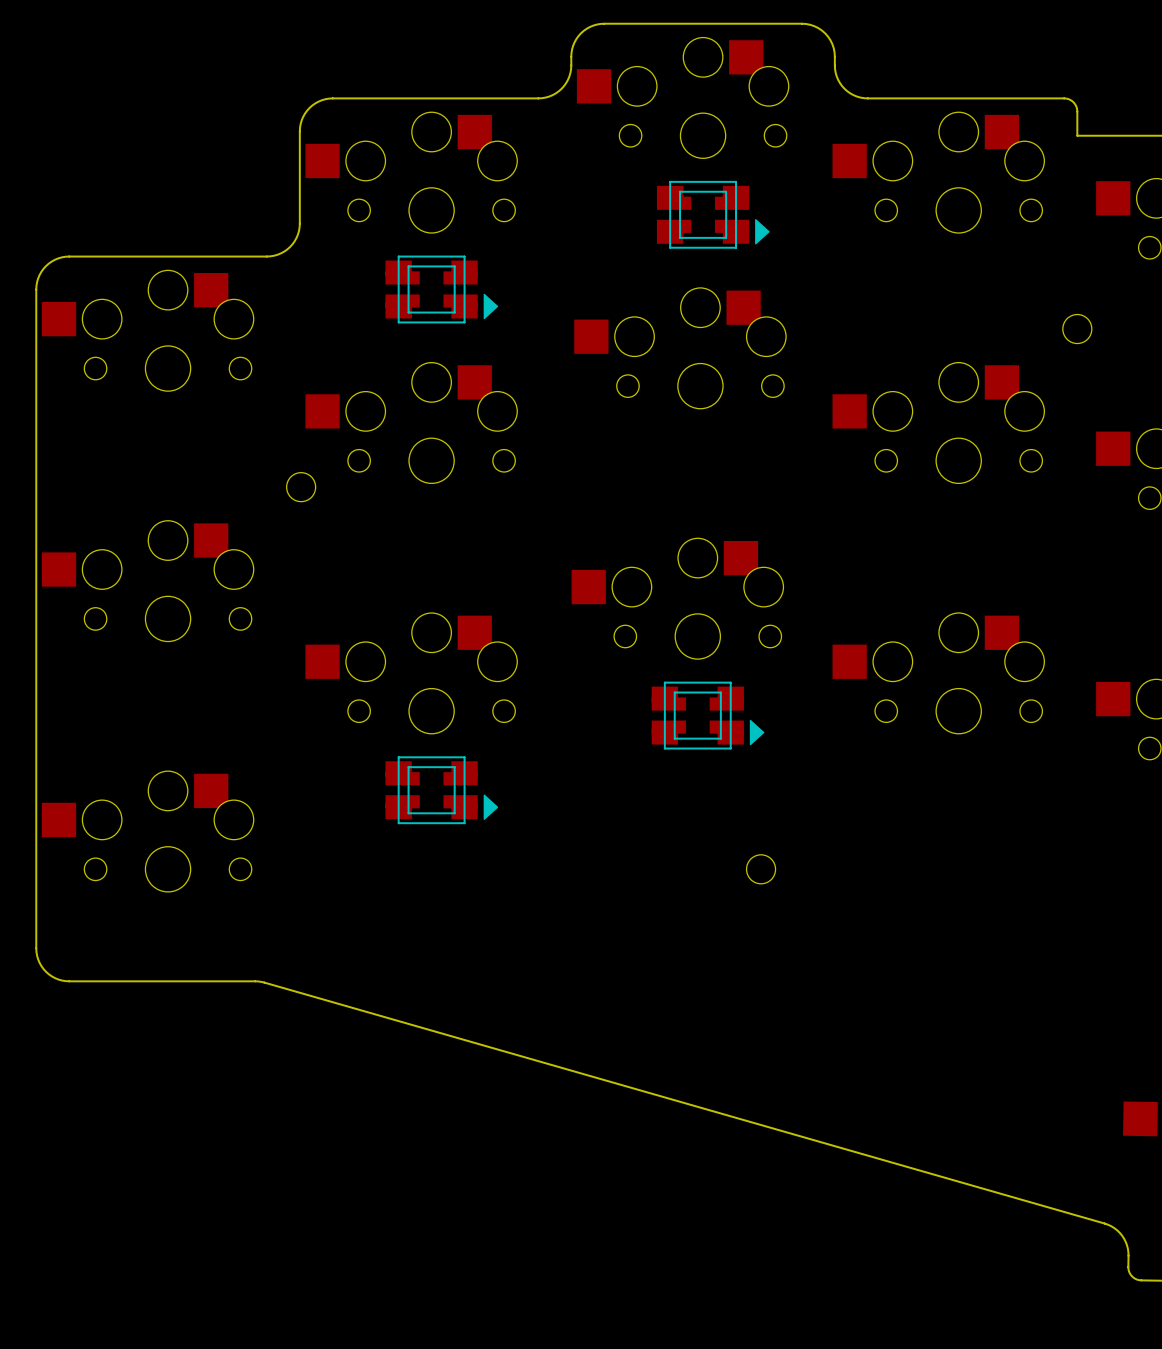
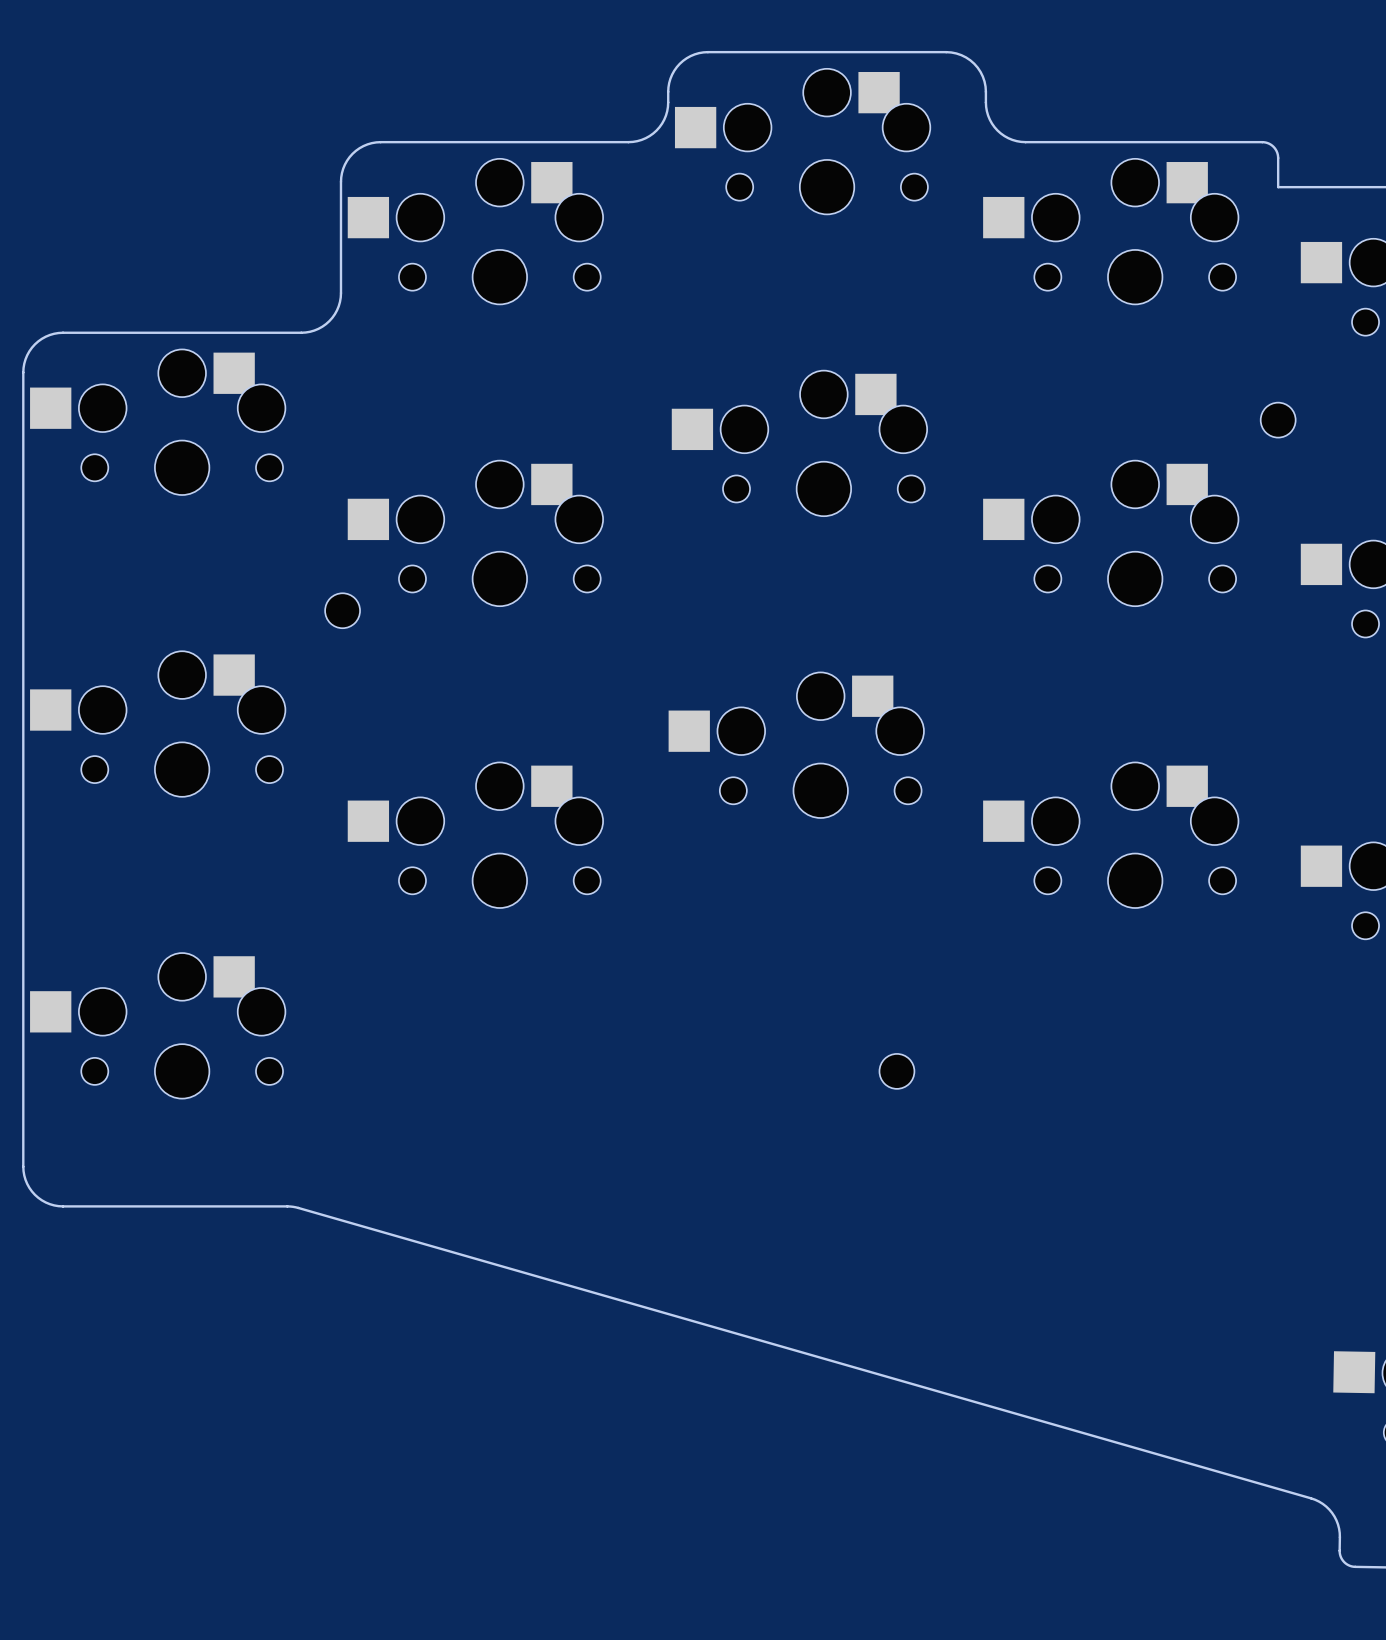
part: (713, 214) -> none
part: (441, 289) -> none
part: (708, 715) -> none
part: (441, 790) -> none

